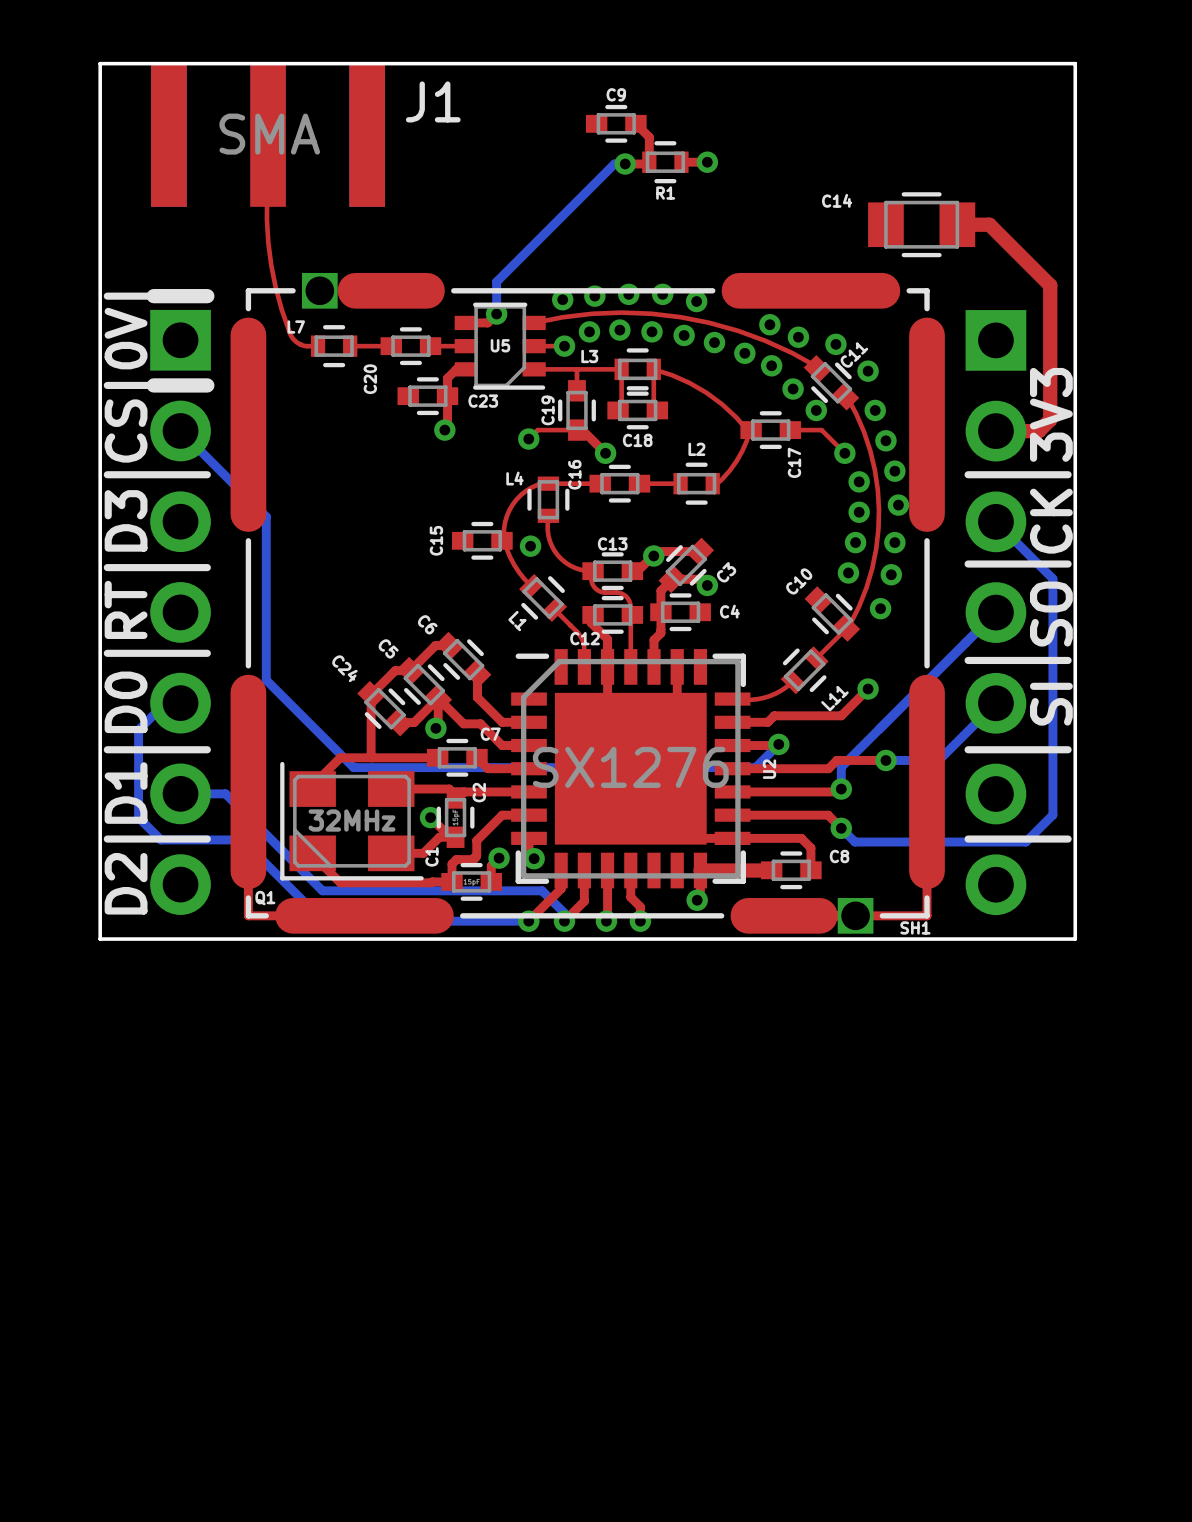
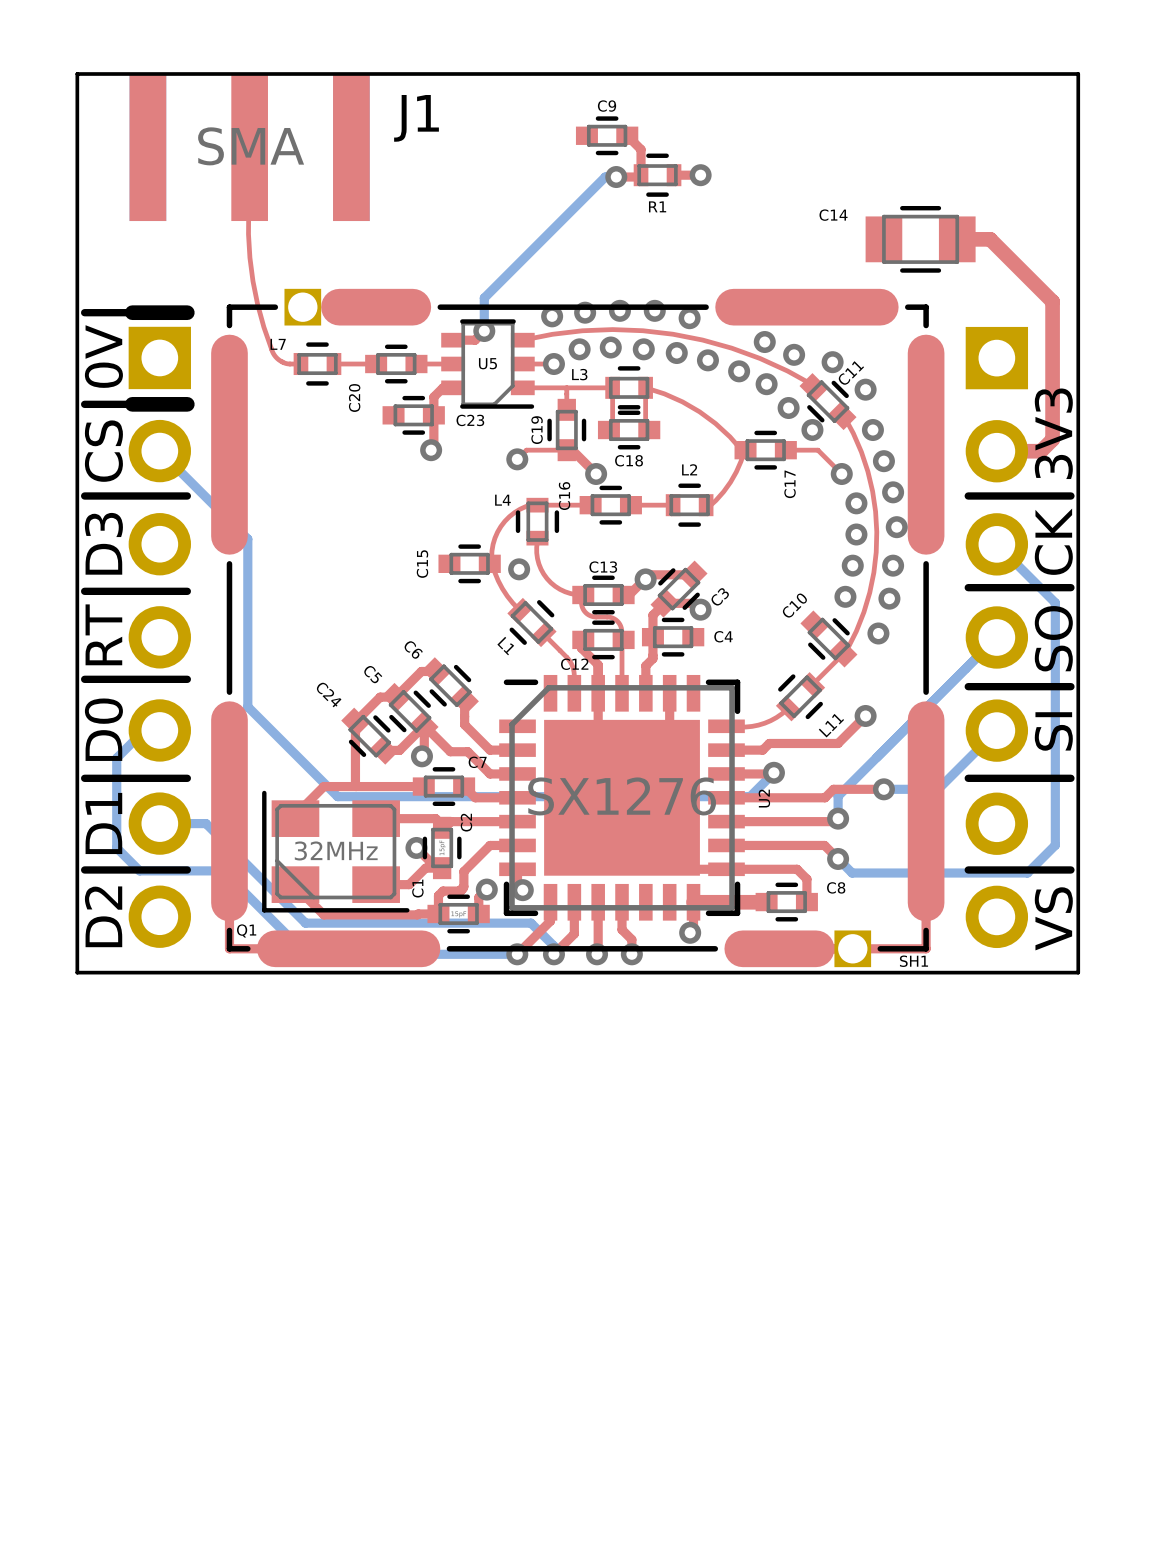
text: none -> VS (1053, 918)

